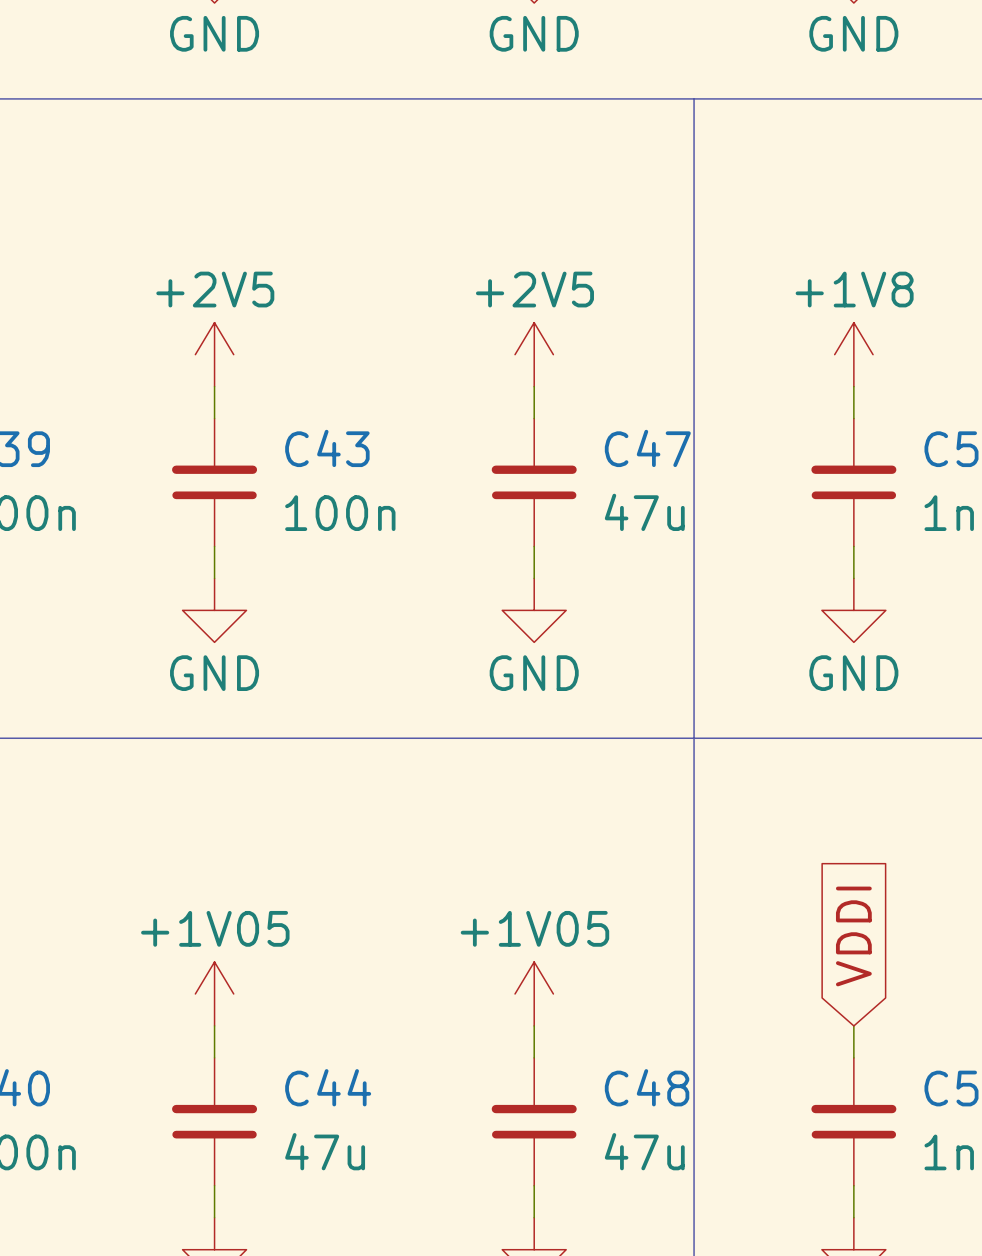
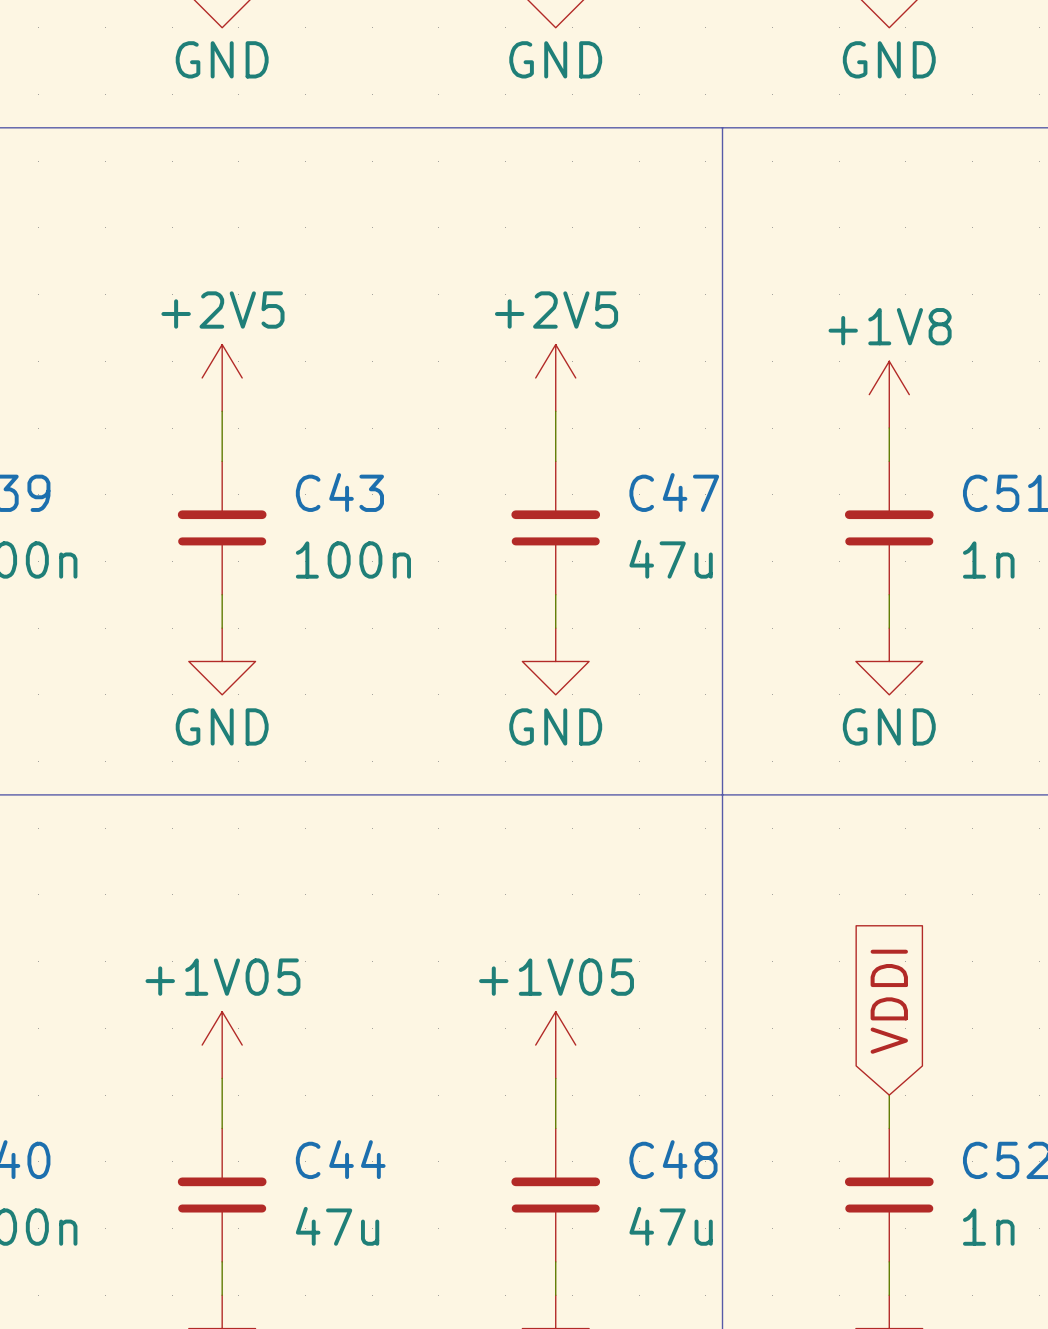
power symbol position: +2V5 (214, 354) -> +2V5 (222, 377)
power symbol position: +2V5 (534, 354) -> +2V5 (555, 377)
power symbol position: +1V05 (214, 993) -> +1V05 (222, 1045)
power symbol position: +1V05 (534, 993) -> +1V05 (555, 1045)

